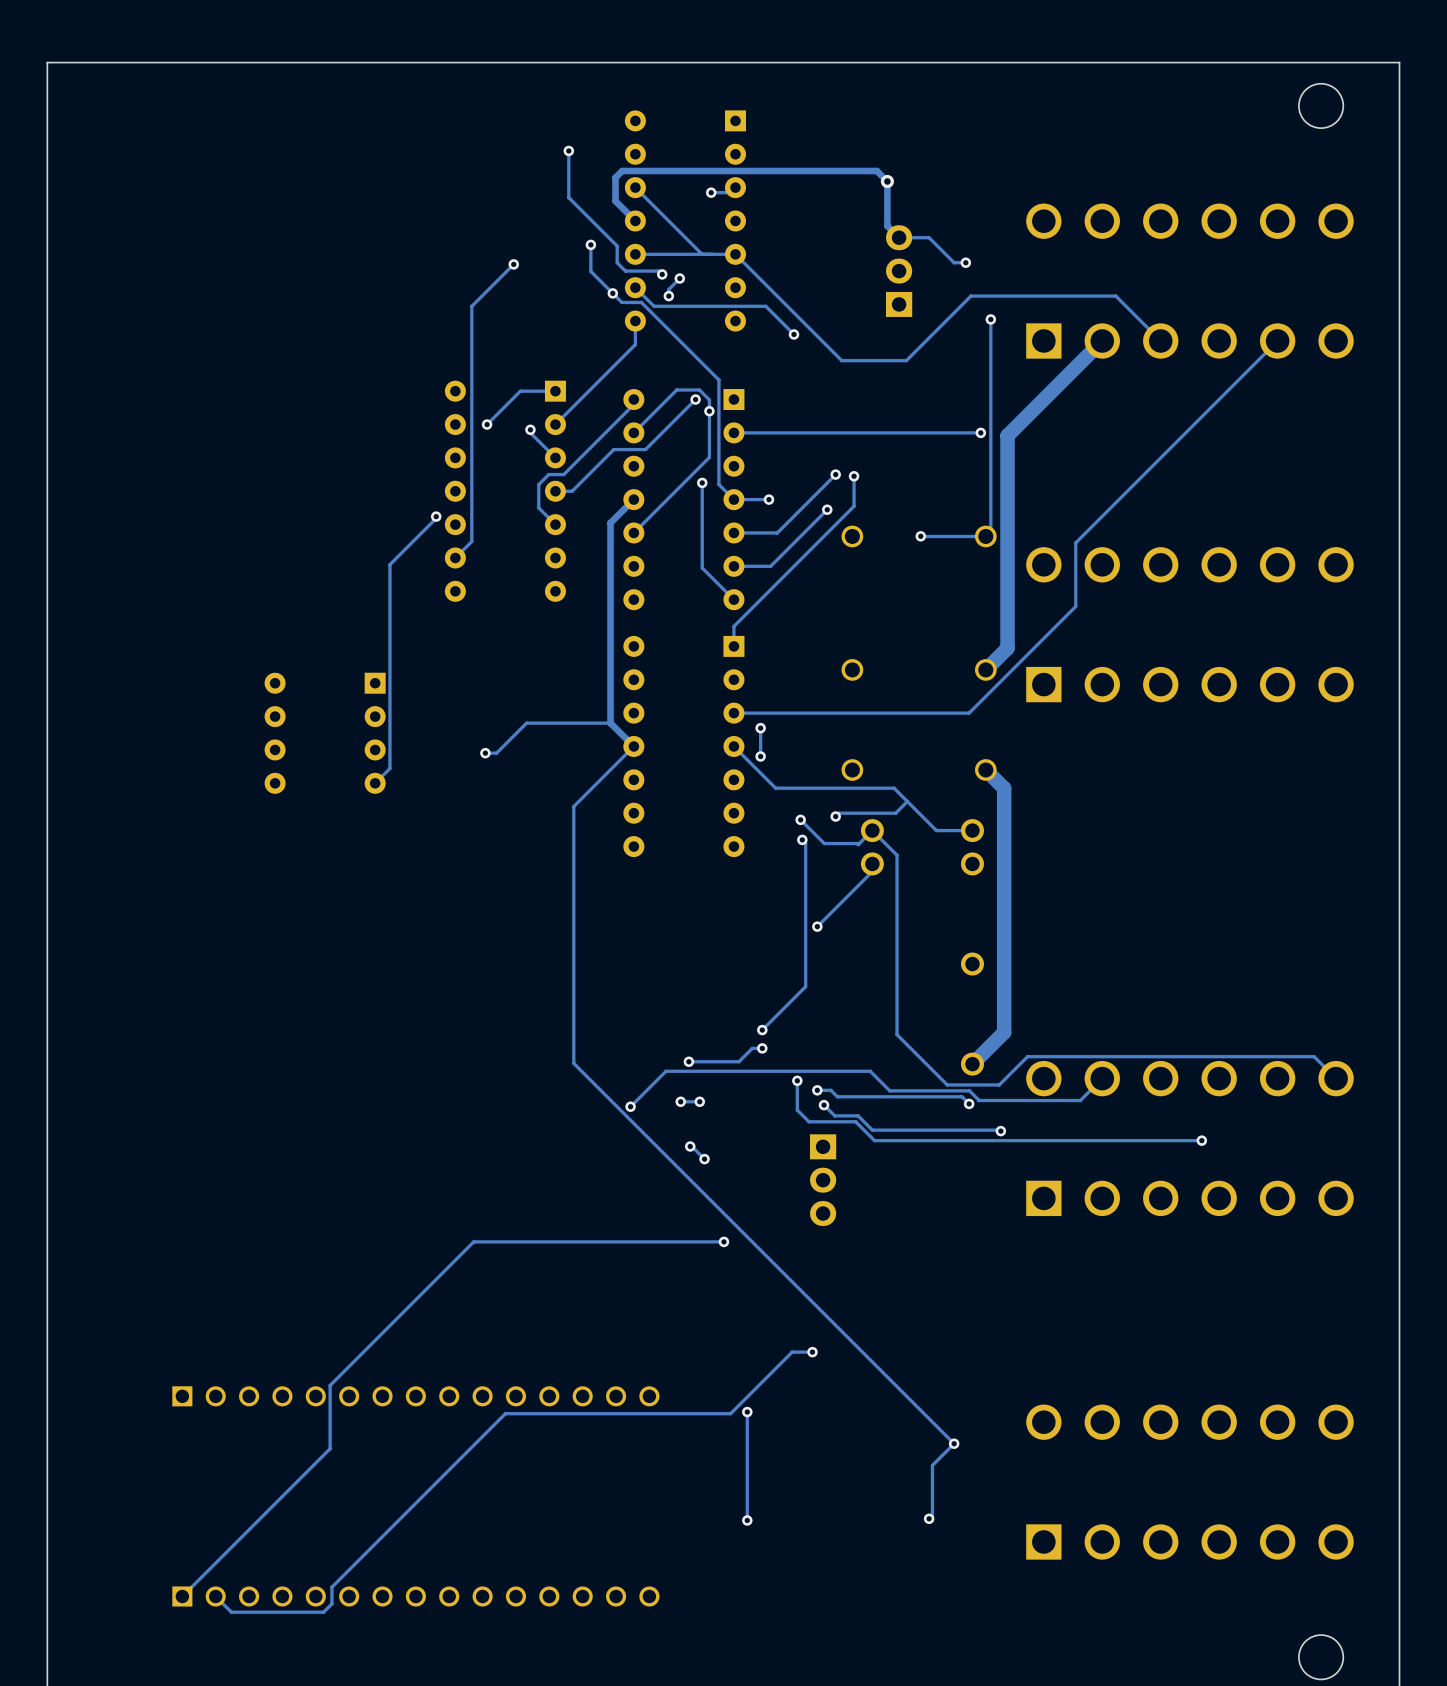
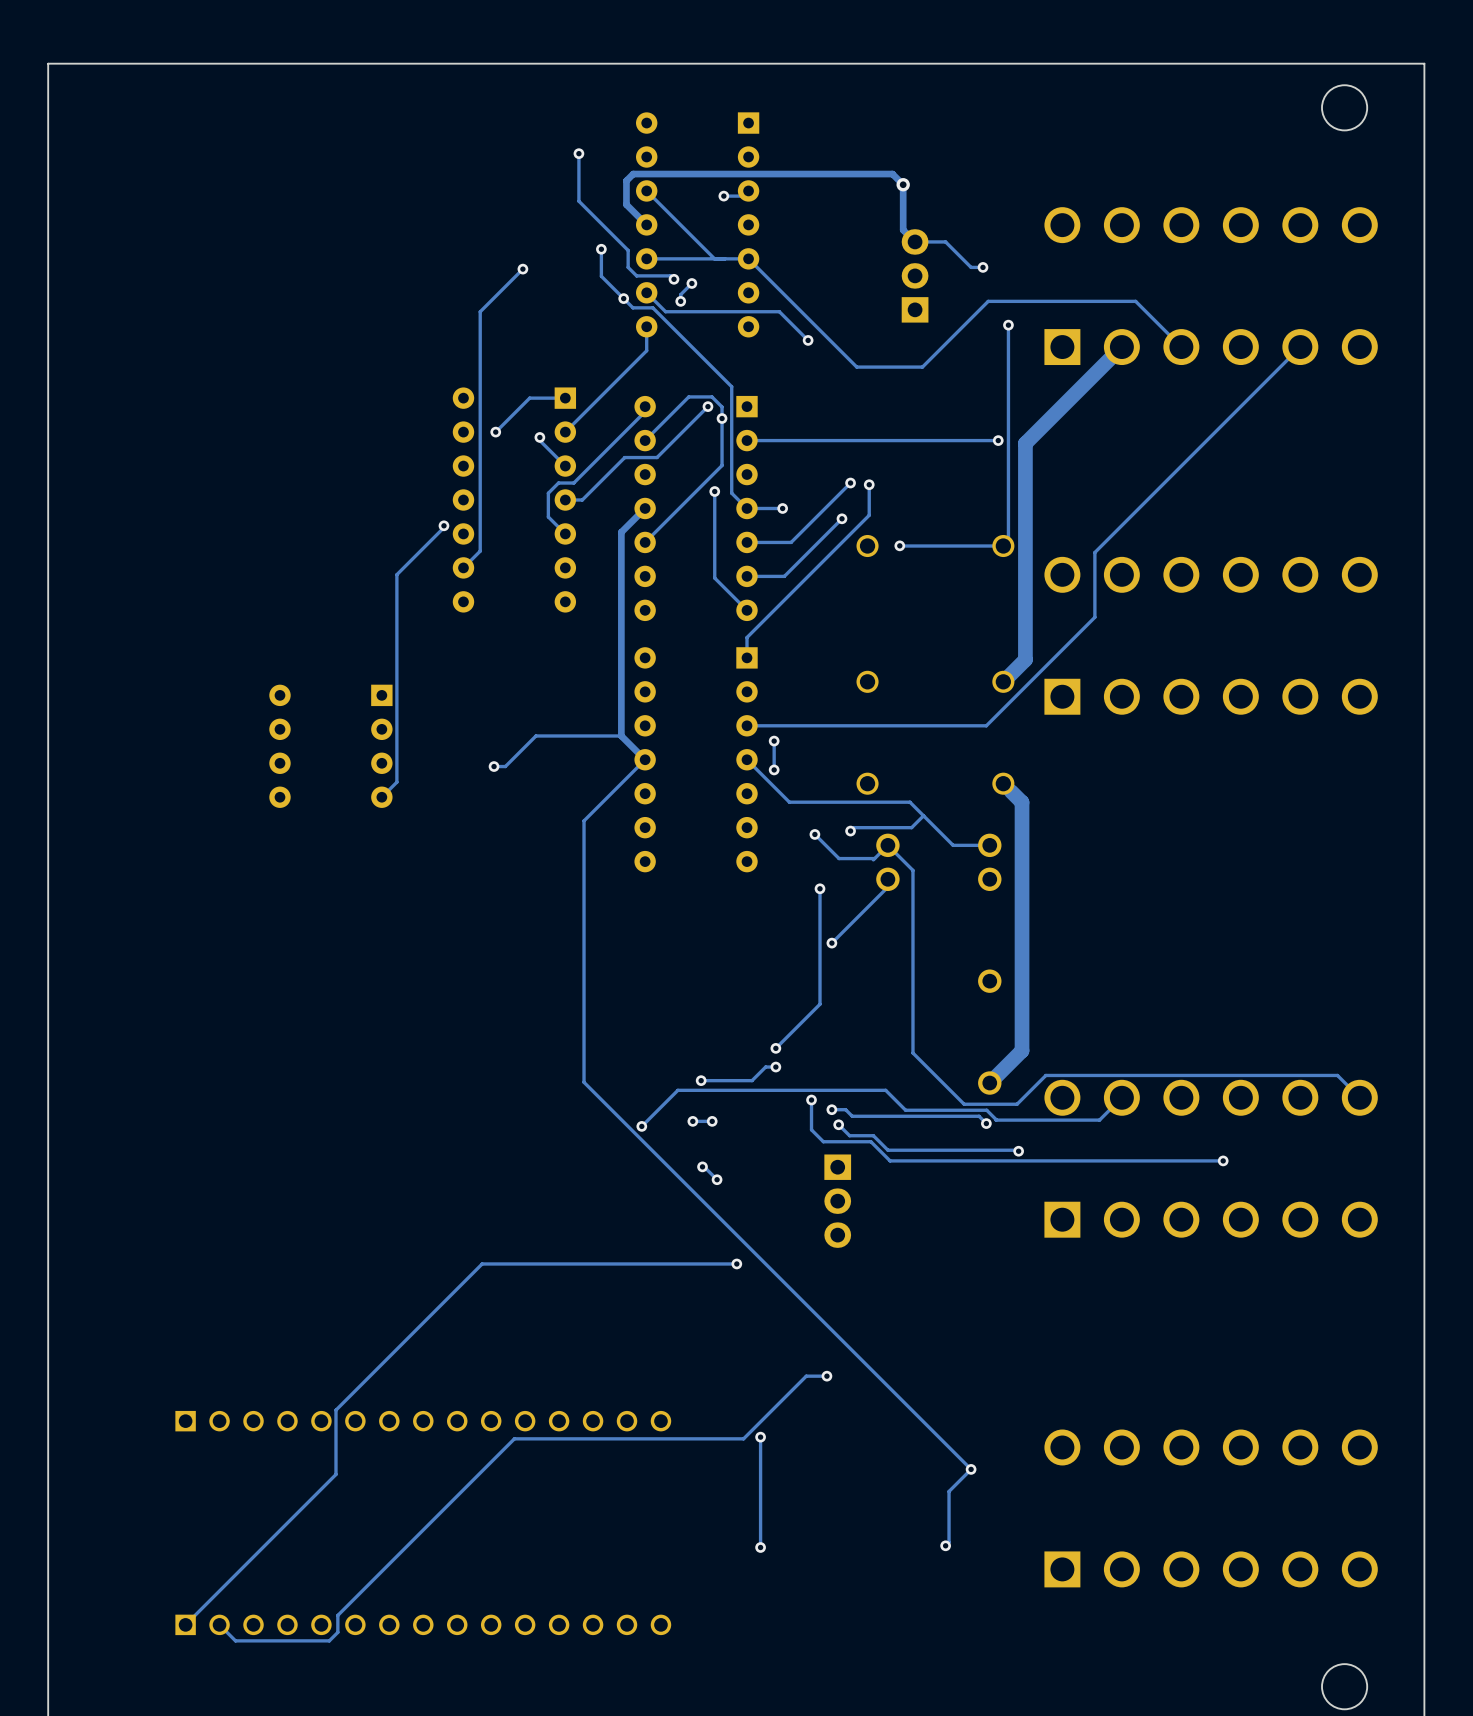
track: none -> (937, 546) (899, 546)
via position: (920, 536) -> (899, 545)
track: (802, 839) (805, 843) (805, 873) -> none
via position: (802, 839) -> (820, 888)

